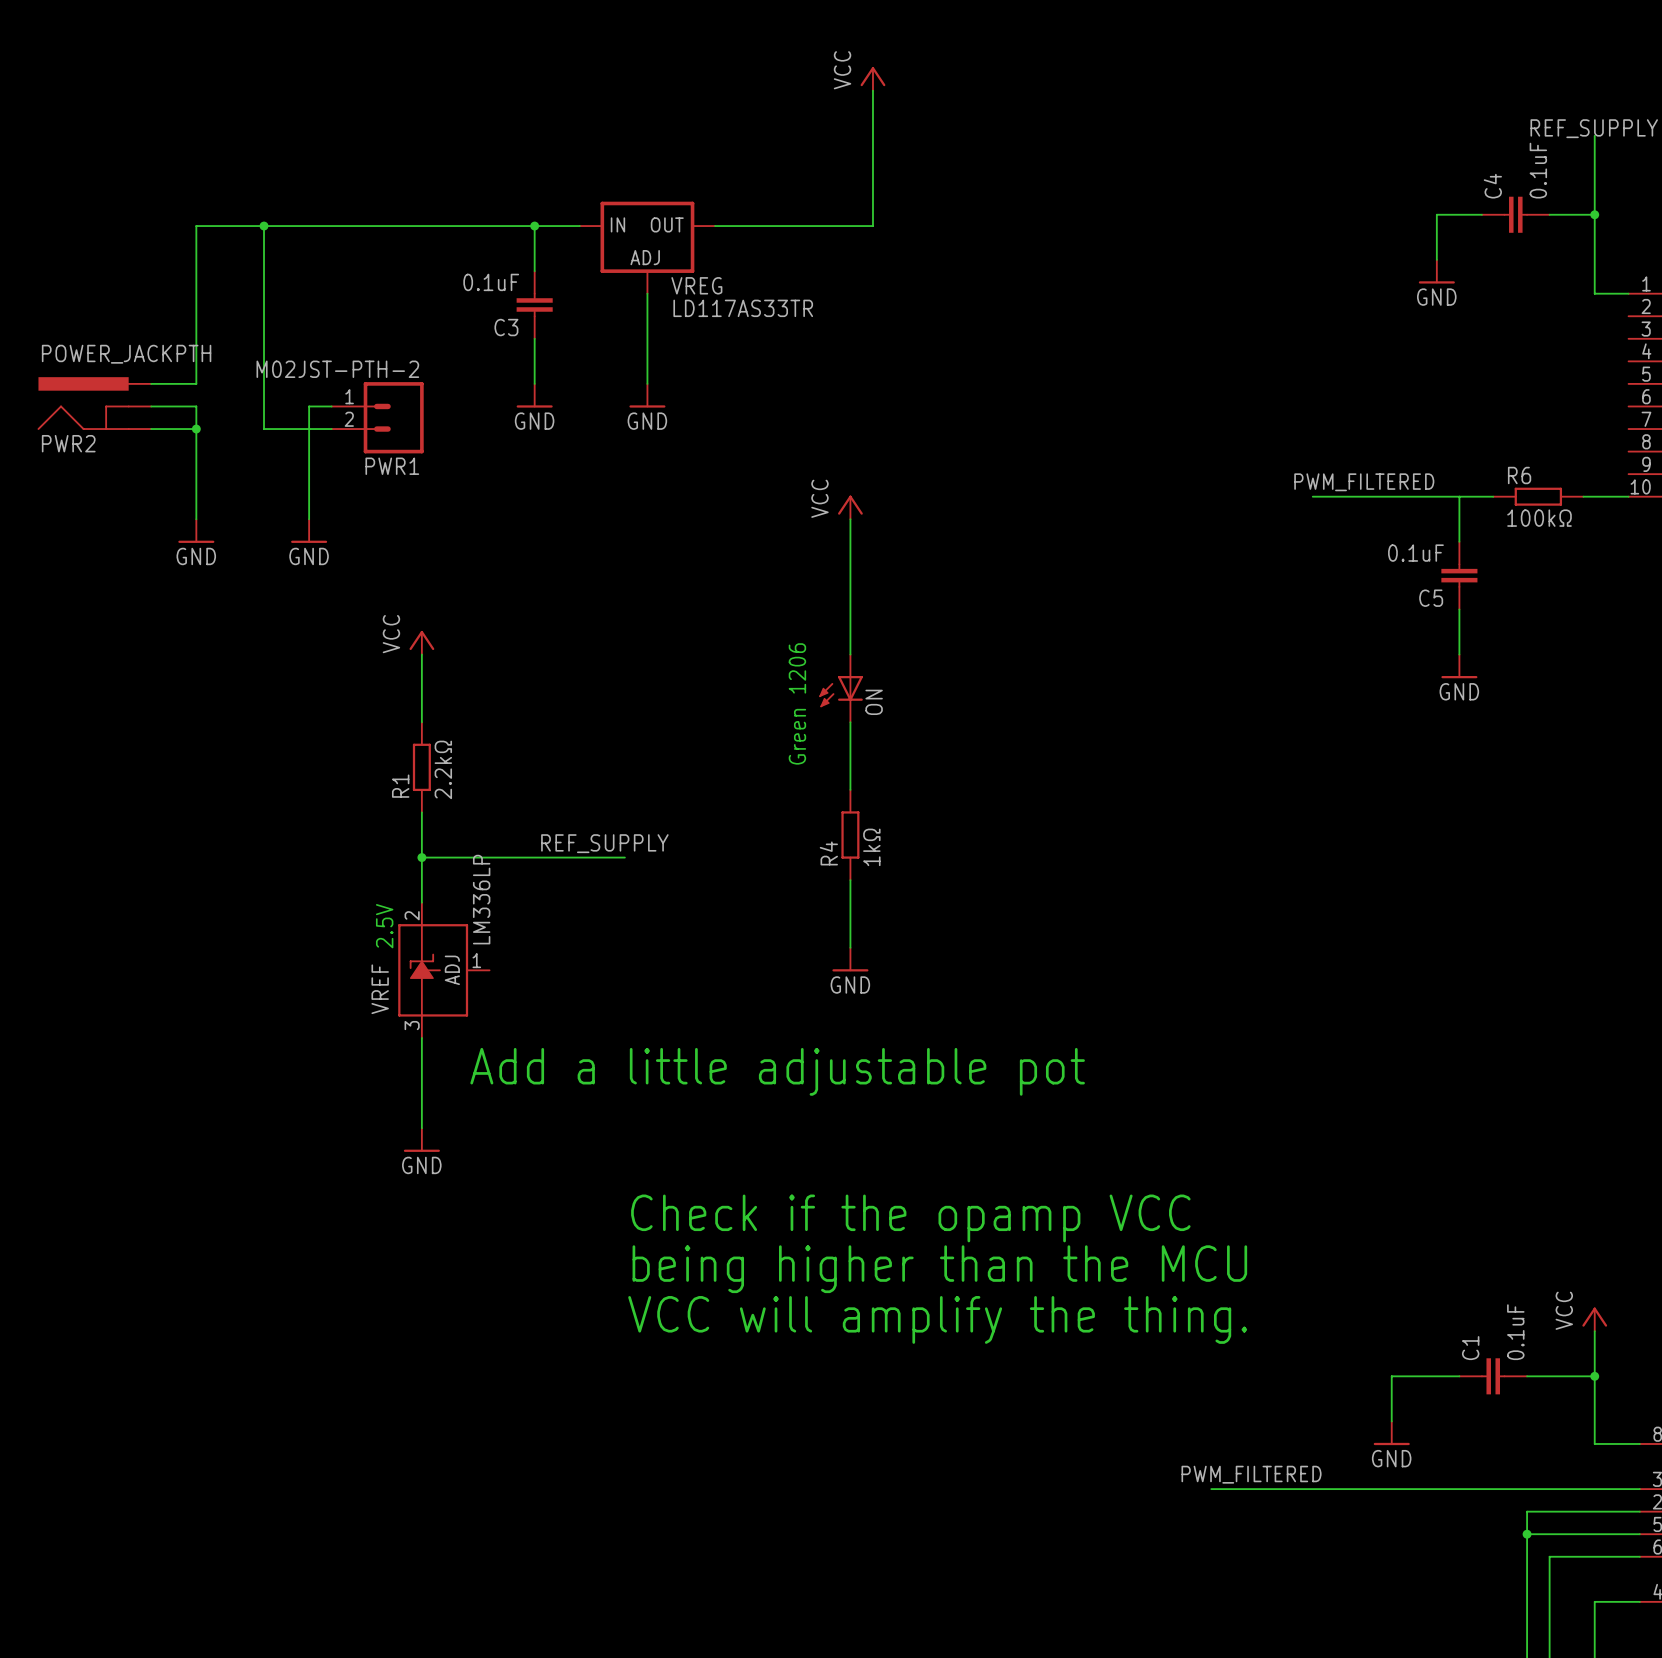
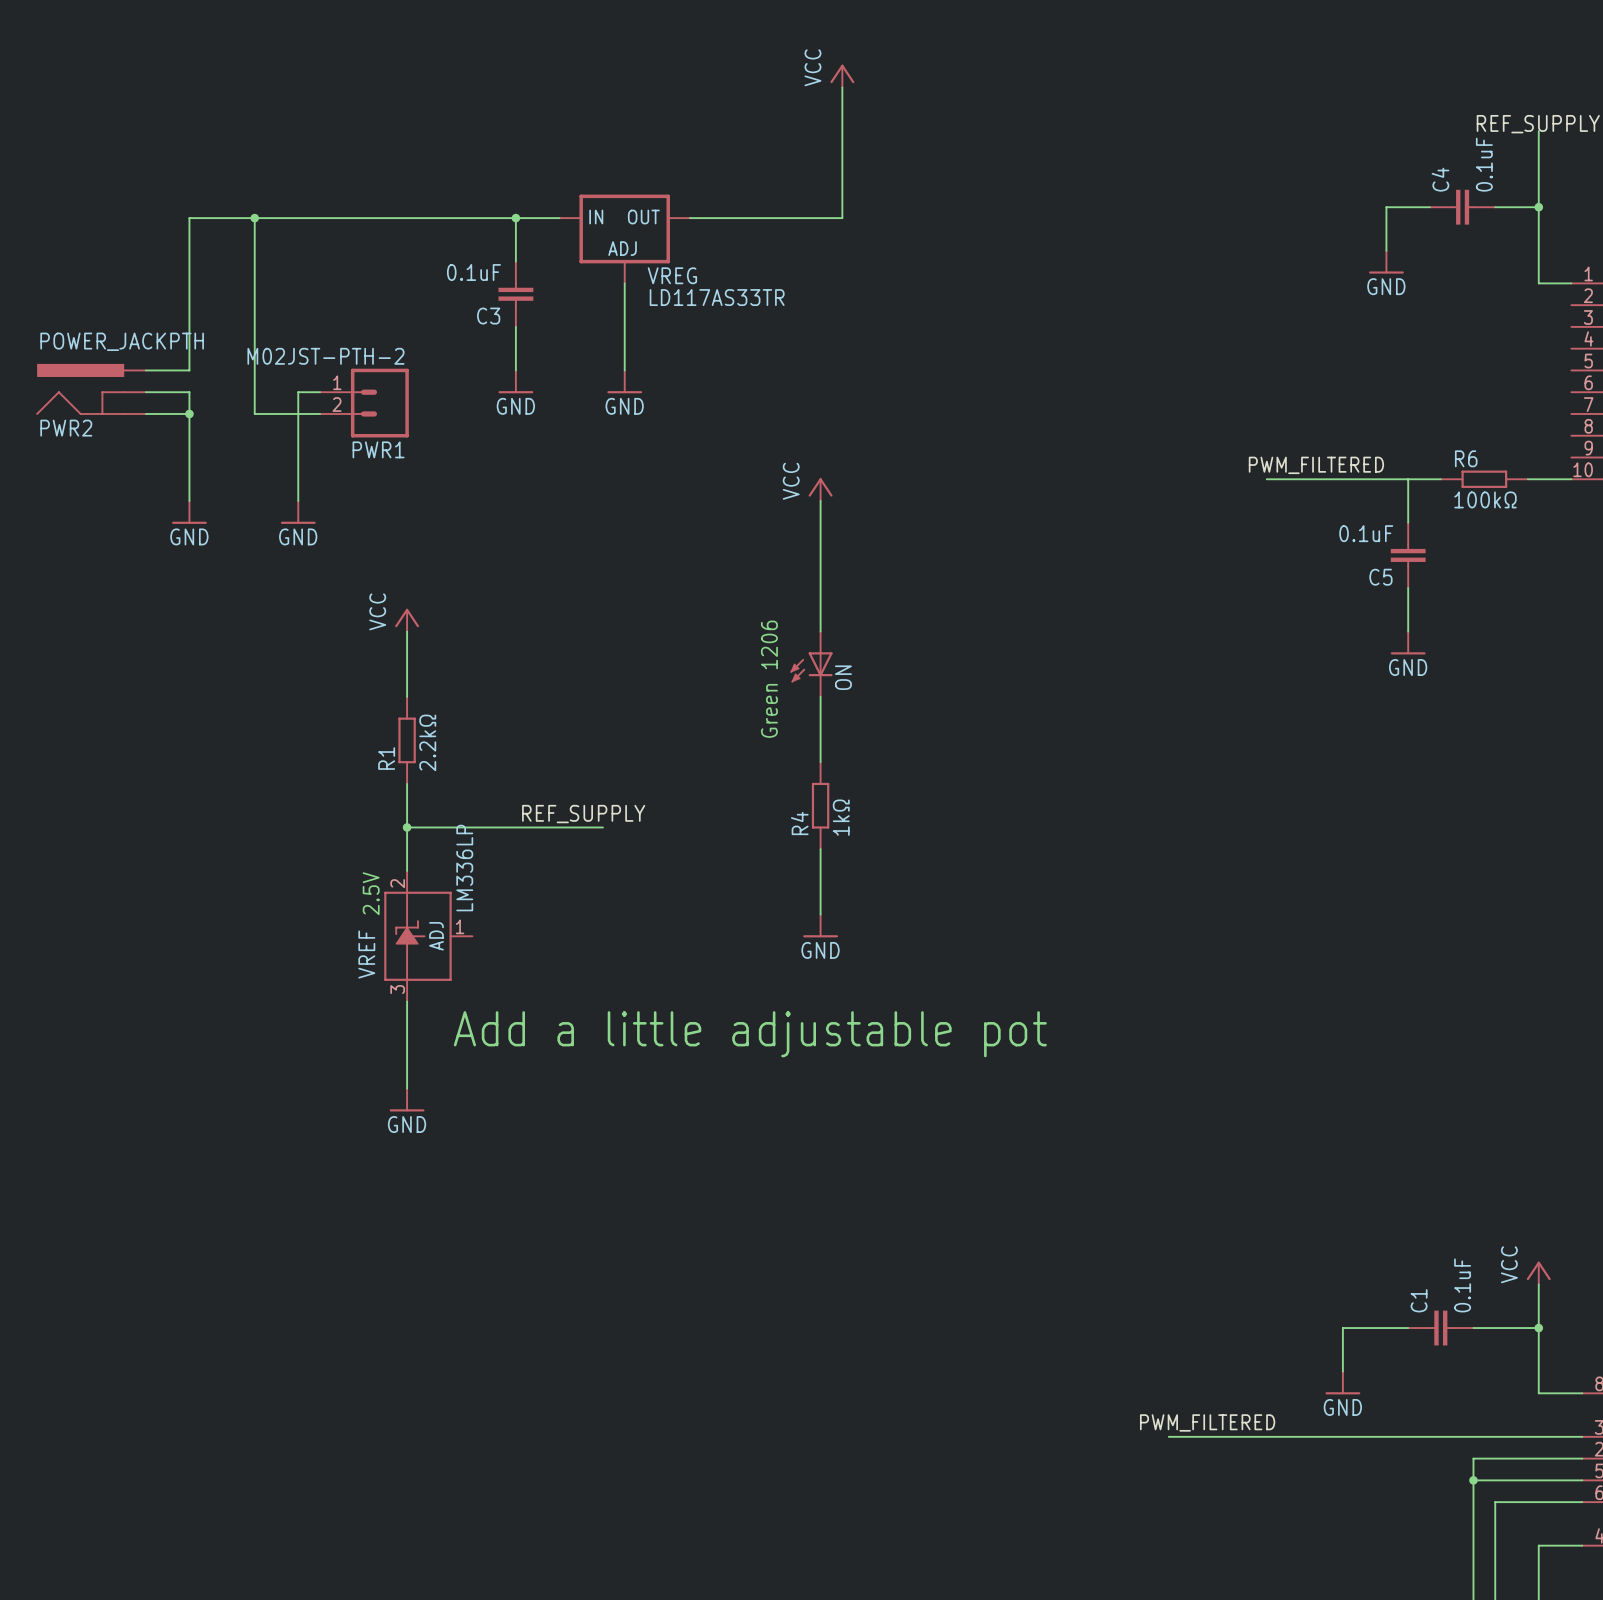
text: Check if the opamp VCC (910, 1218) -> none
text: being higher than the MCU (939, 1269) -> none
text: VCC will amplify the thing. (937, 1319) -> none

